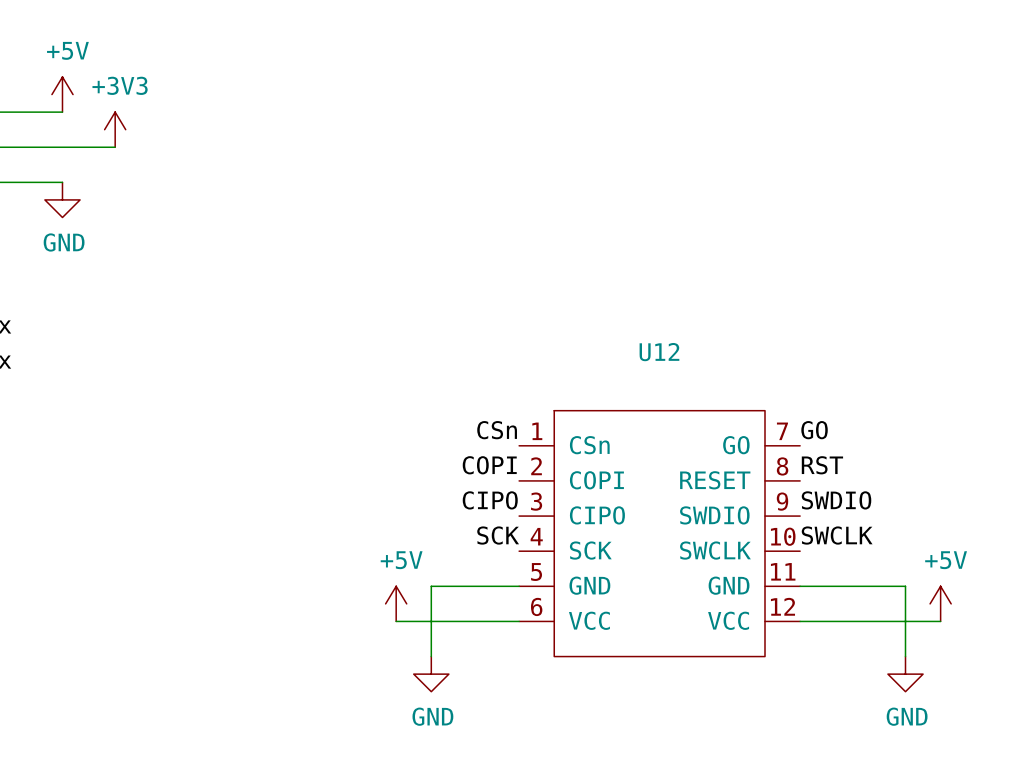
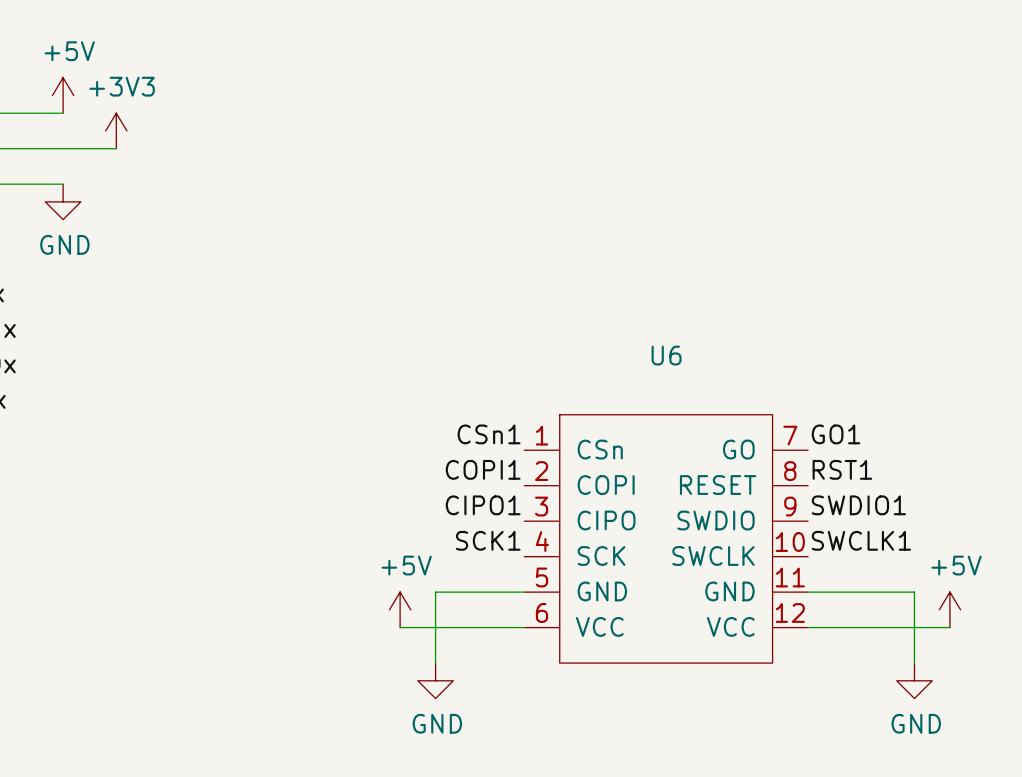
U12 name: U12 (659, 352) -> U6 (666, 355)
label: CSn (497, 430) -> CSn1 (489, 434)
label: GO (814, 430) -> GO1 (836, 434)
label: COPI (489, 465) -> COPI1 (483, 469)
label: RST (822, 465) -> RST1 (842, 469)
label: CIPO (490, 500) -> CIPO1 (483, 505)
label: SWDIO (836, 500) -> SWDIO1 (858, 505)
label: SCK (498, 535) -> SCK1 (488, 540)
label: SWCLK (837, 535) -> SWCLK1 (861, 540)

